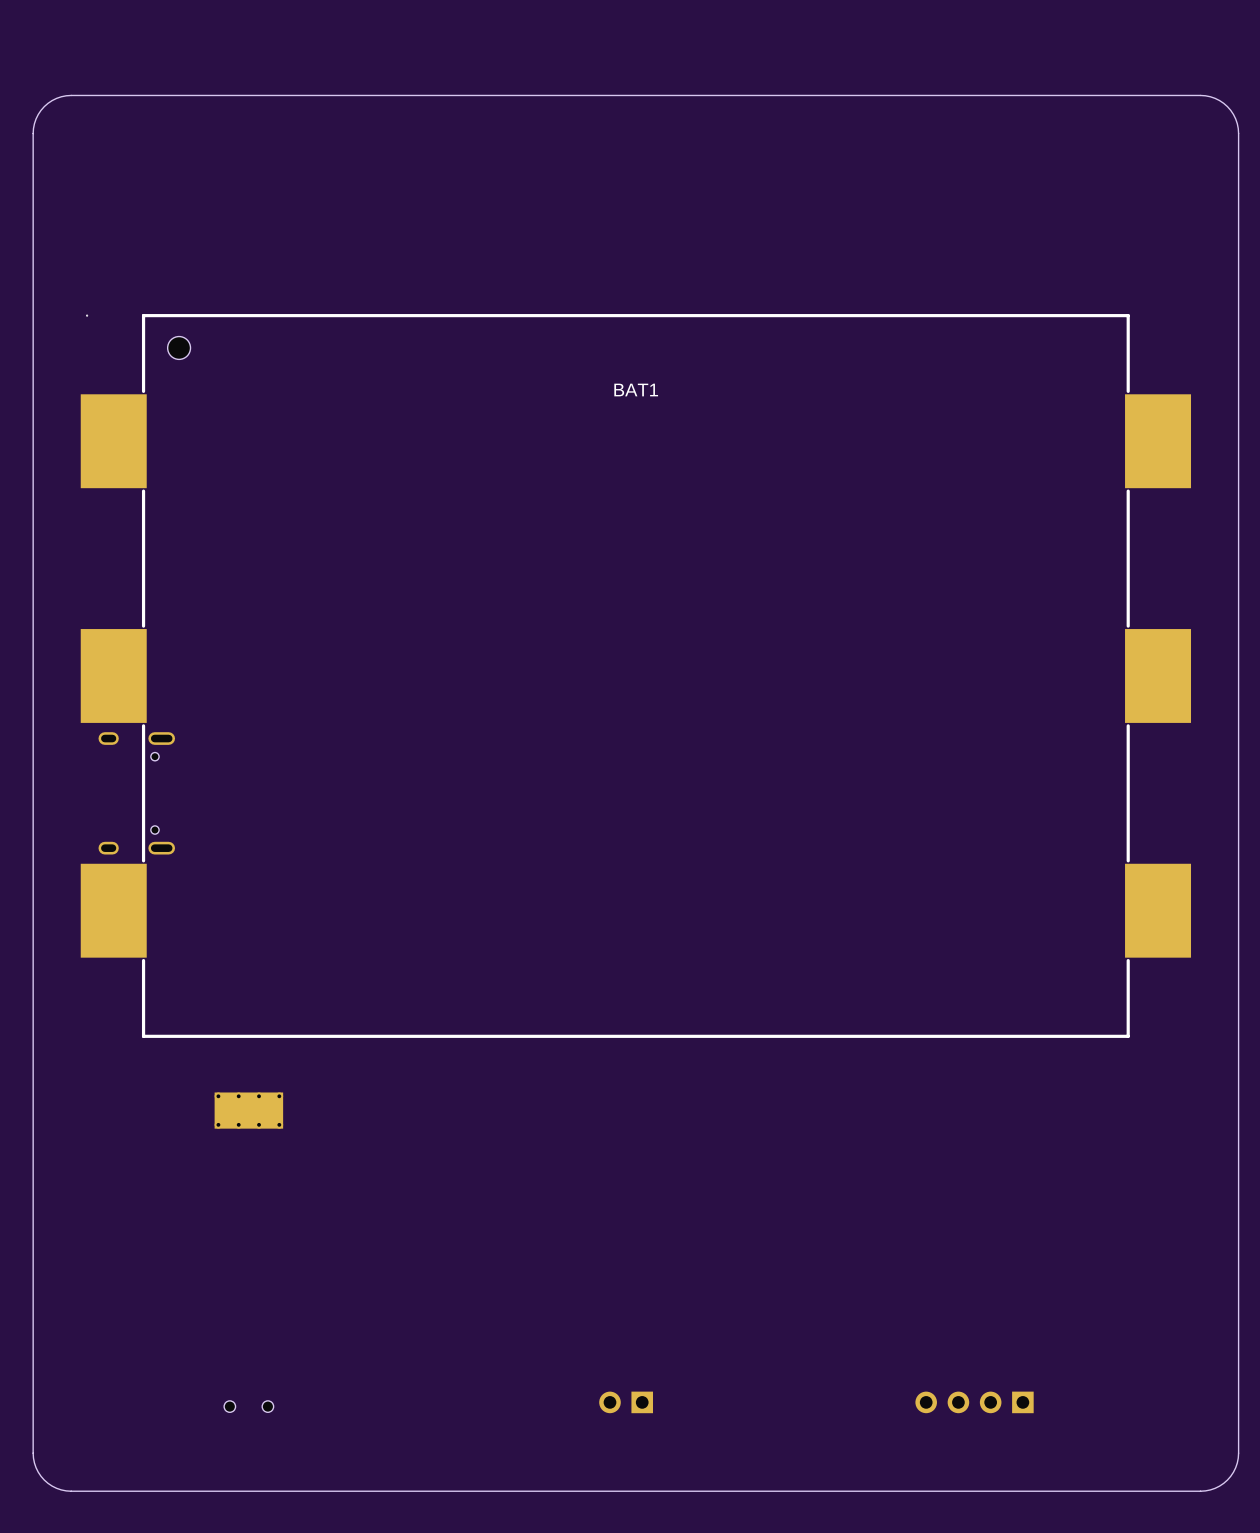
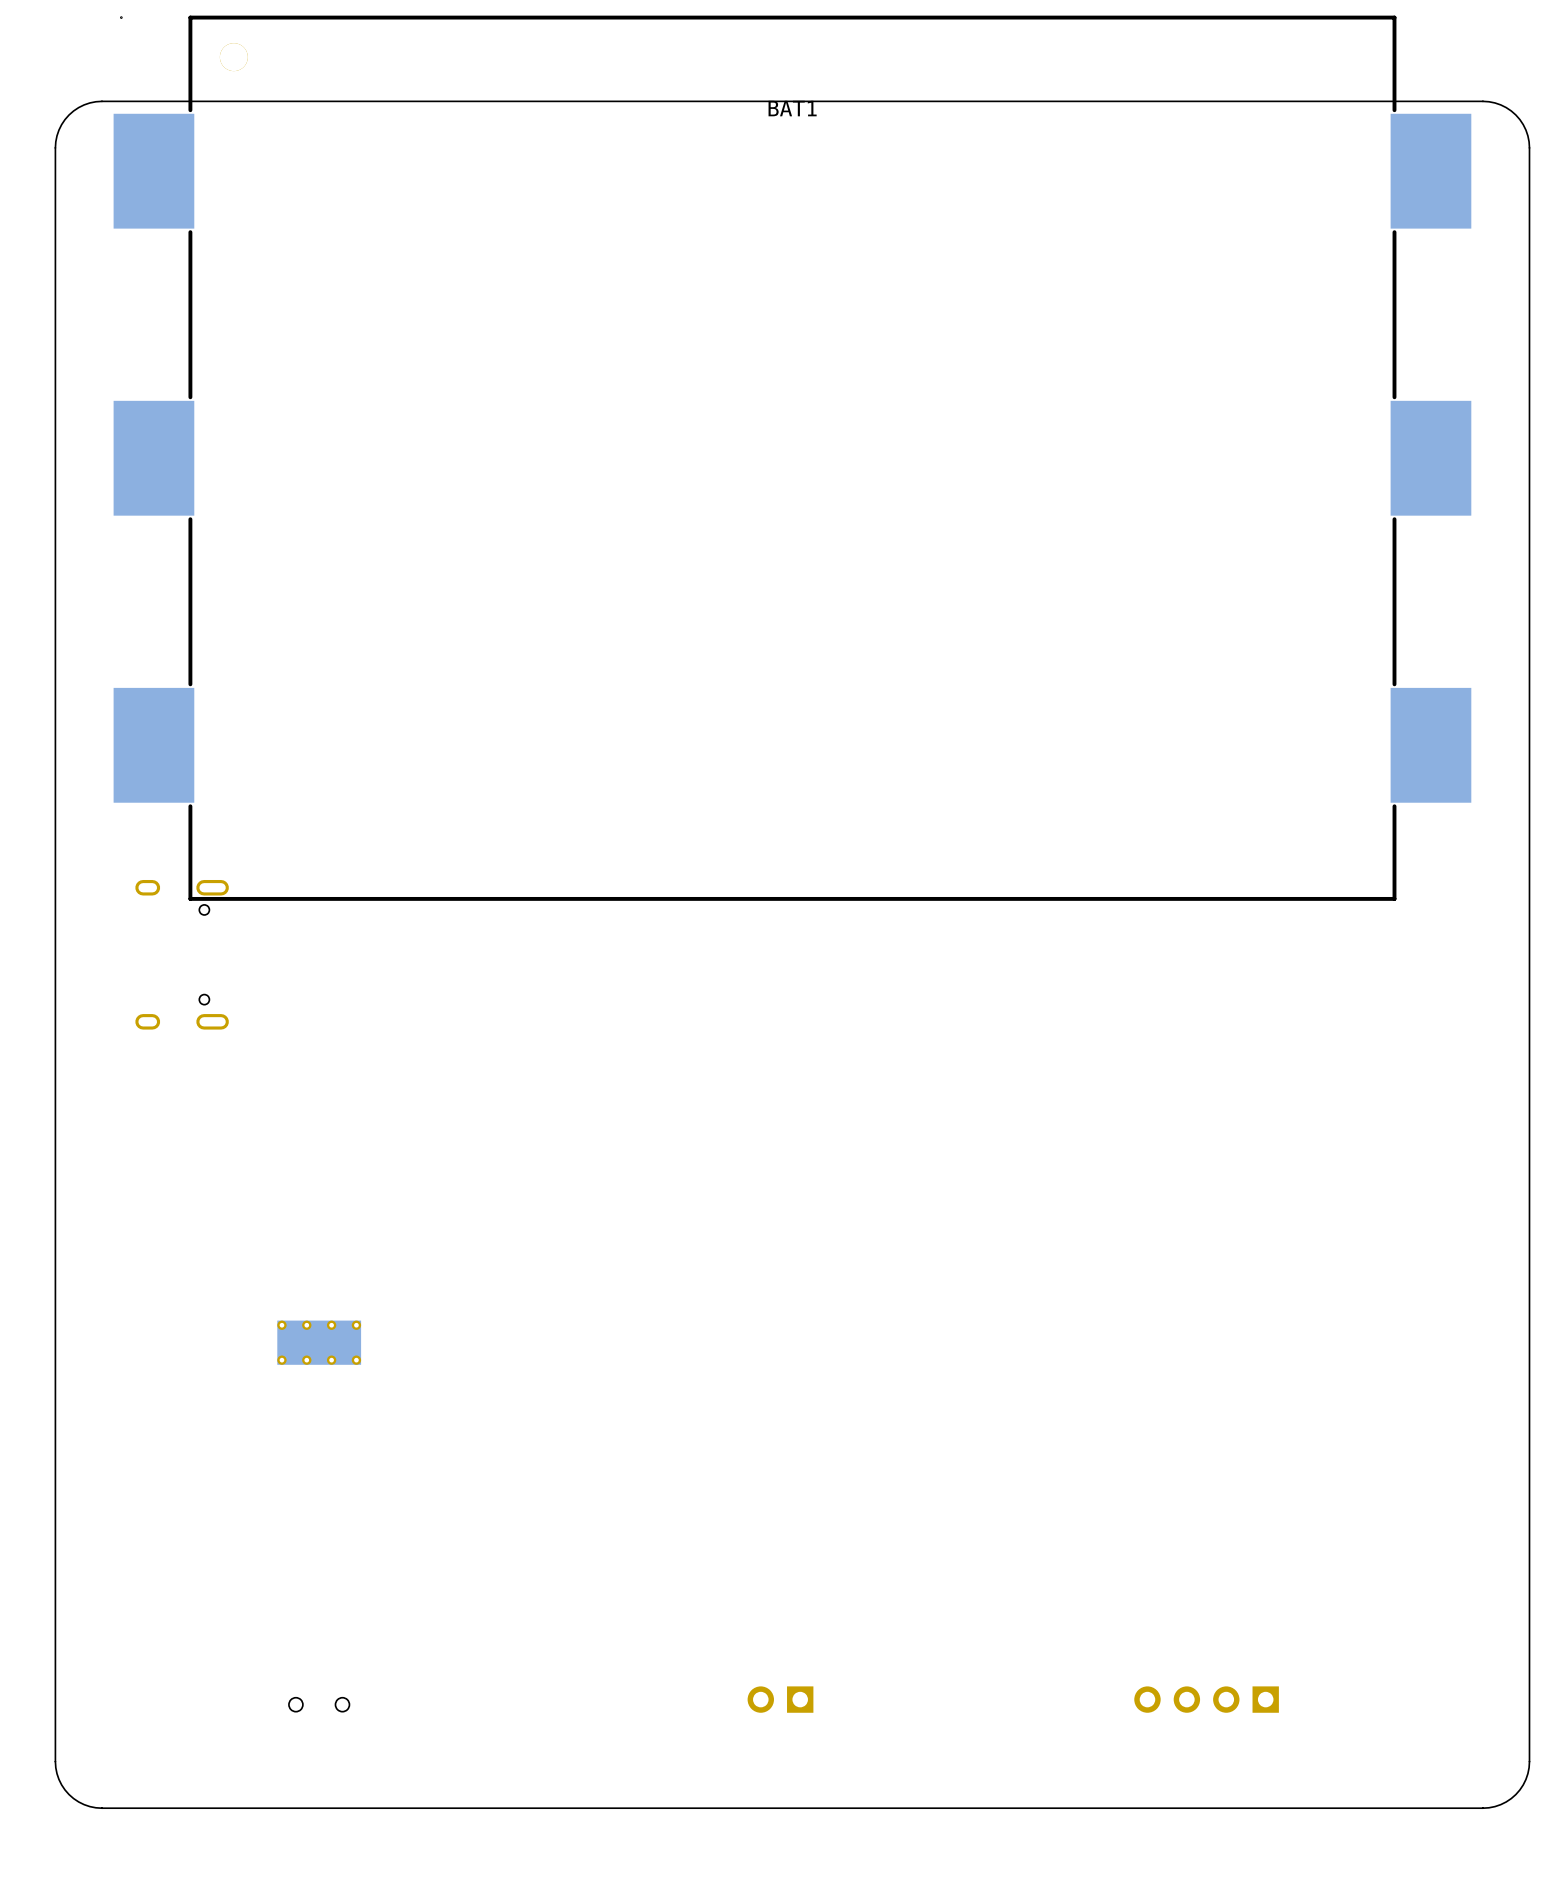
BAT1 footprint: [80, 314, 1192, 1038] -> [113, 15, 1472, 901]

